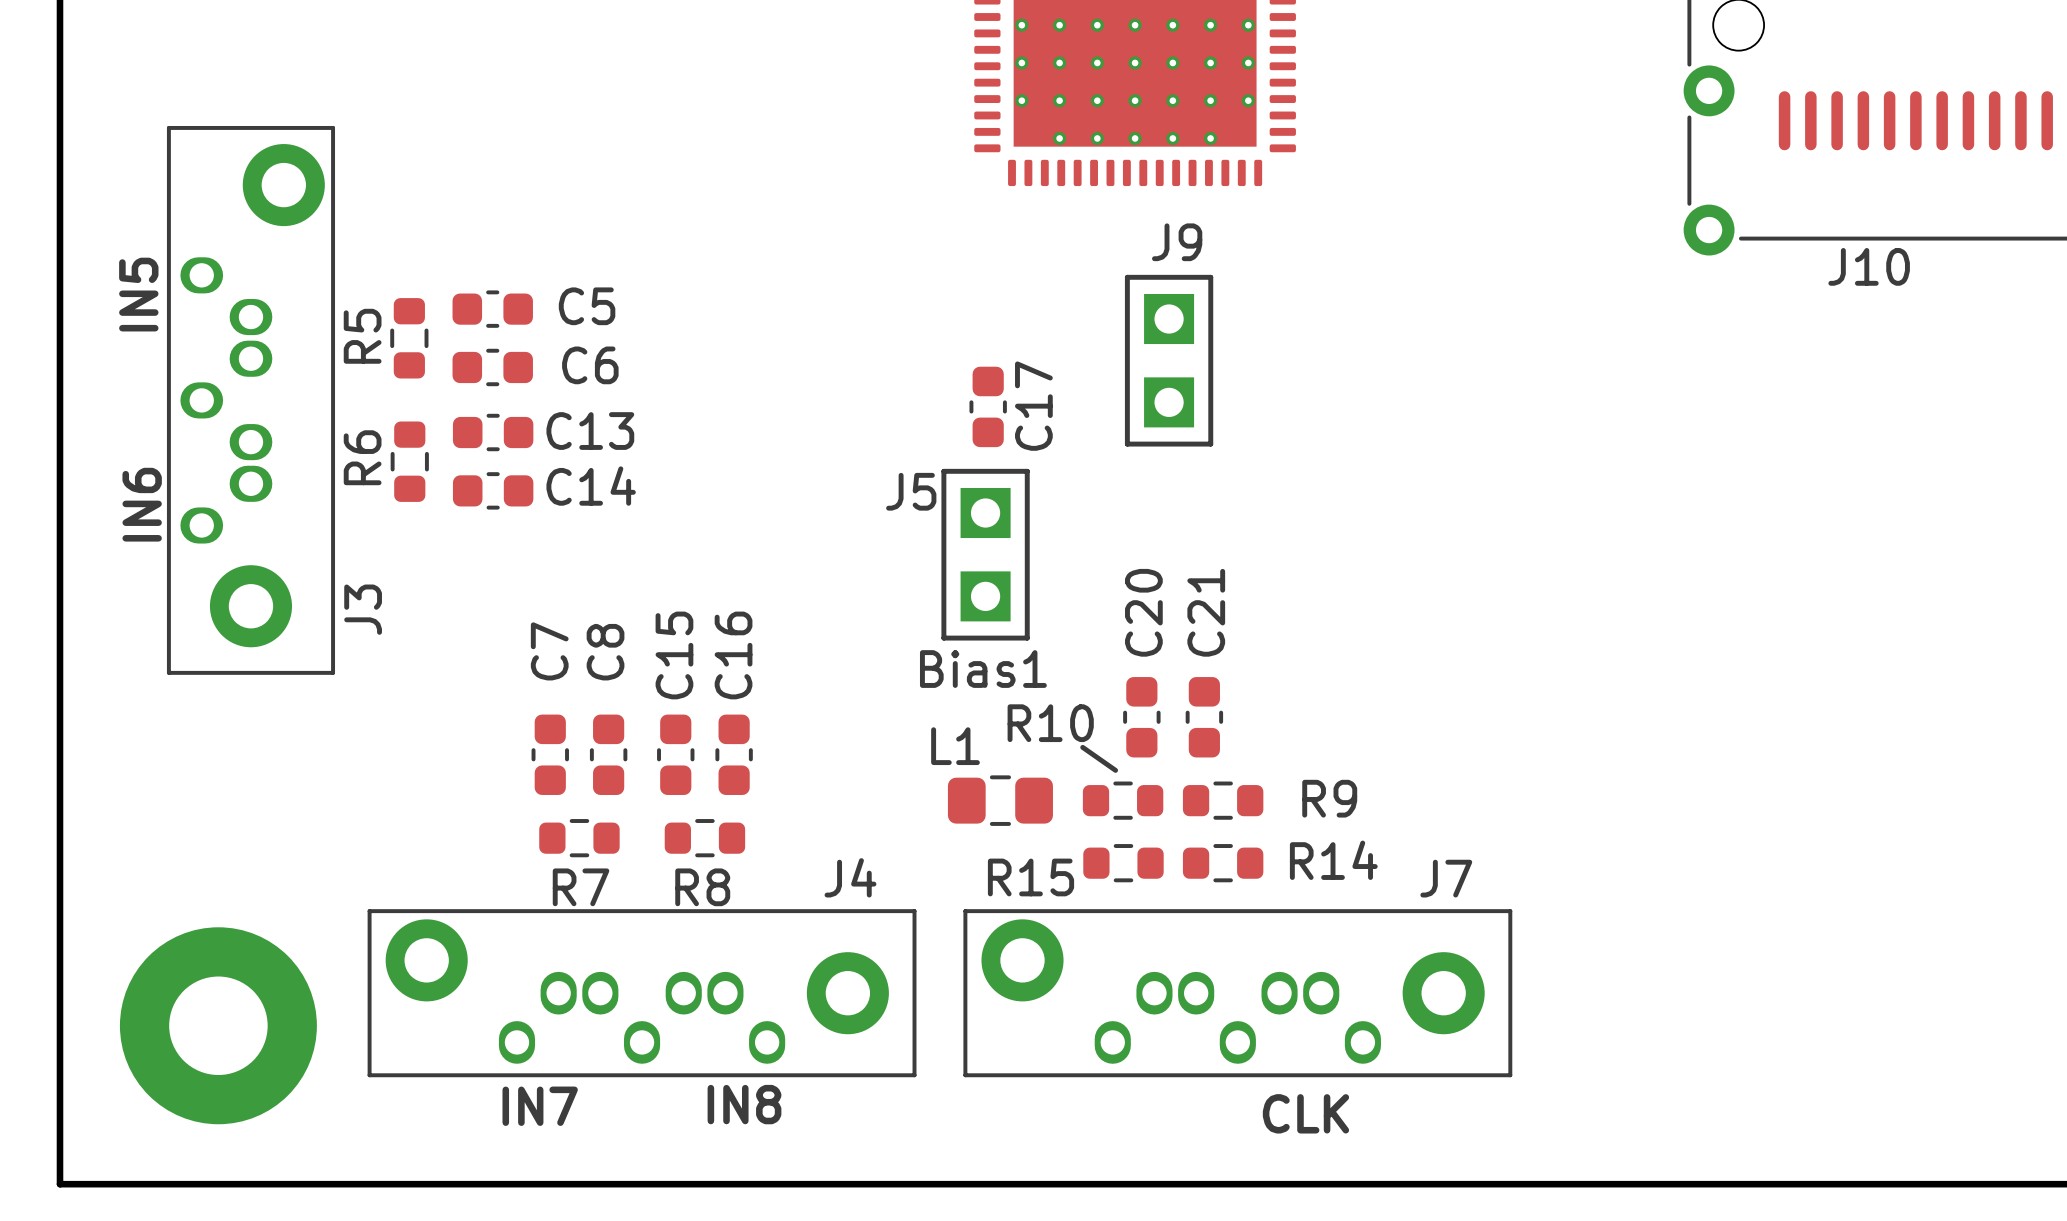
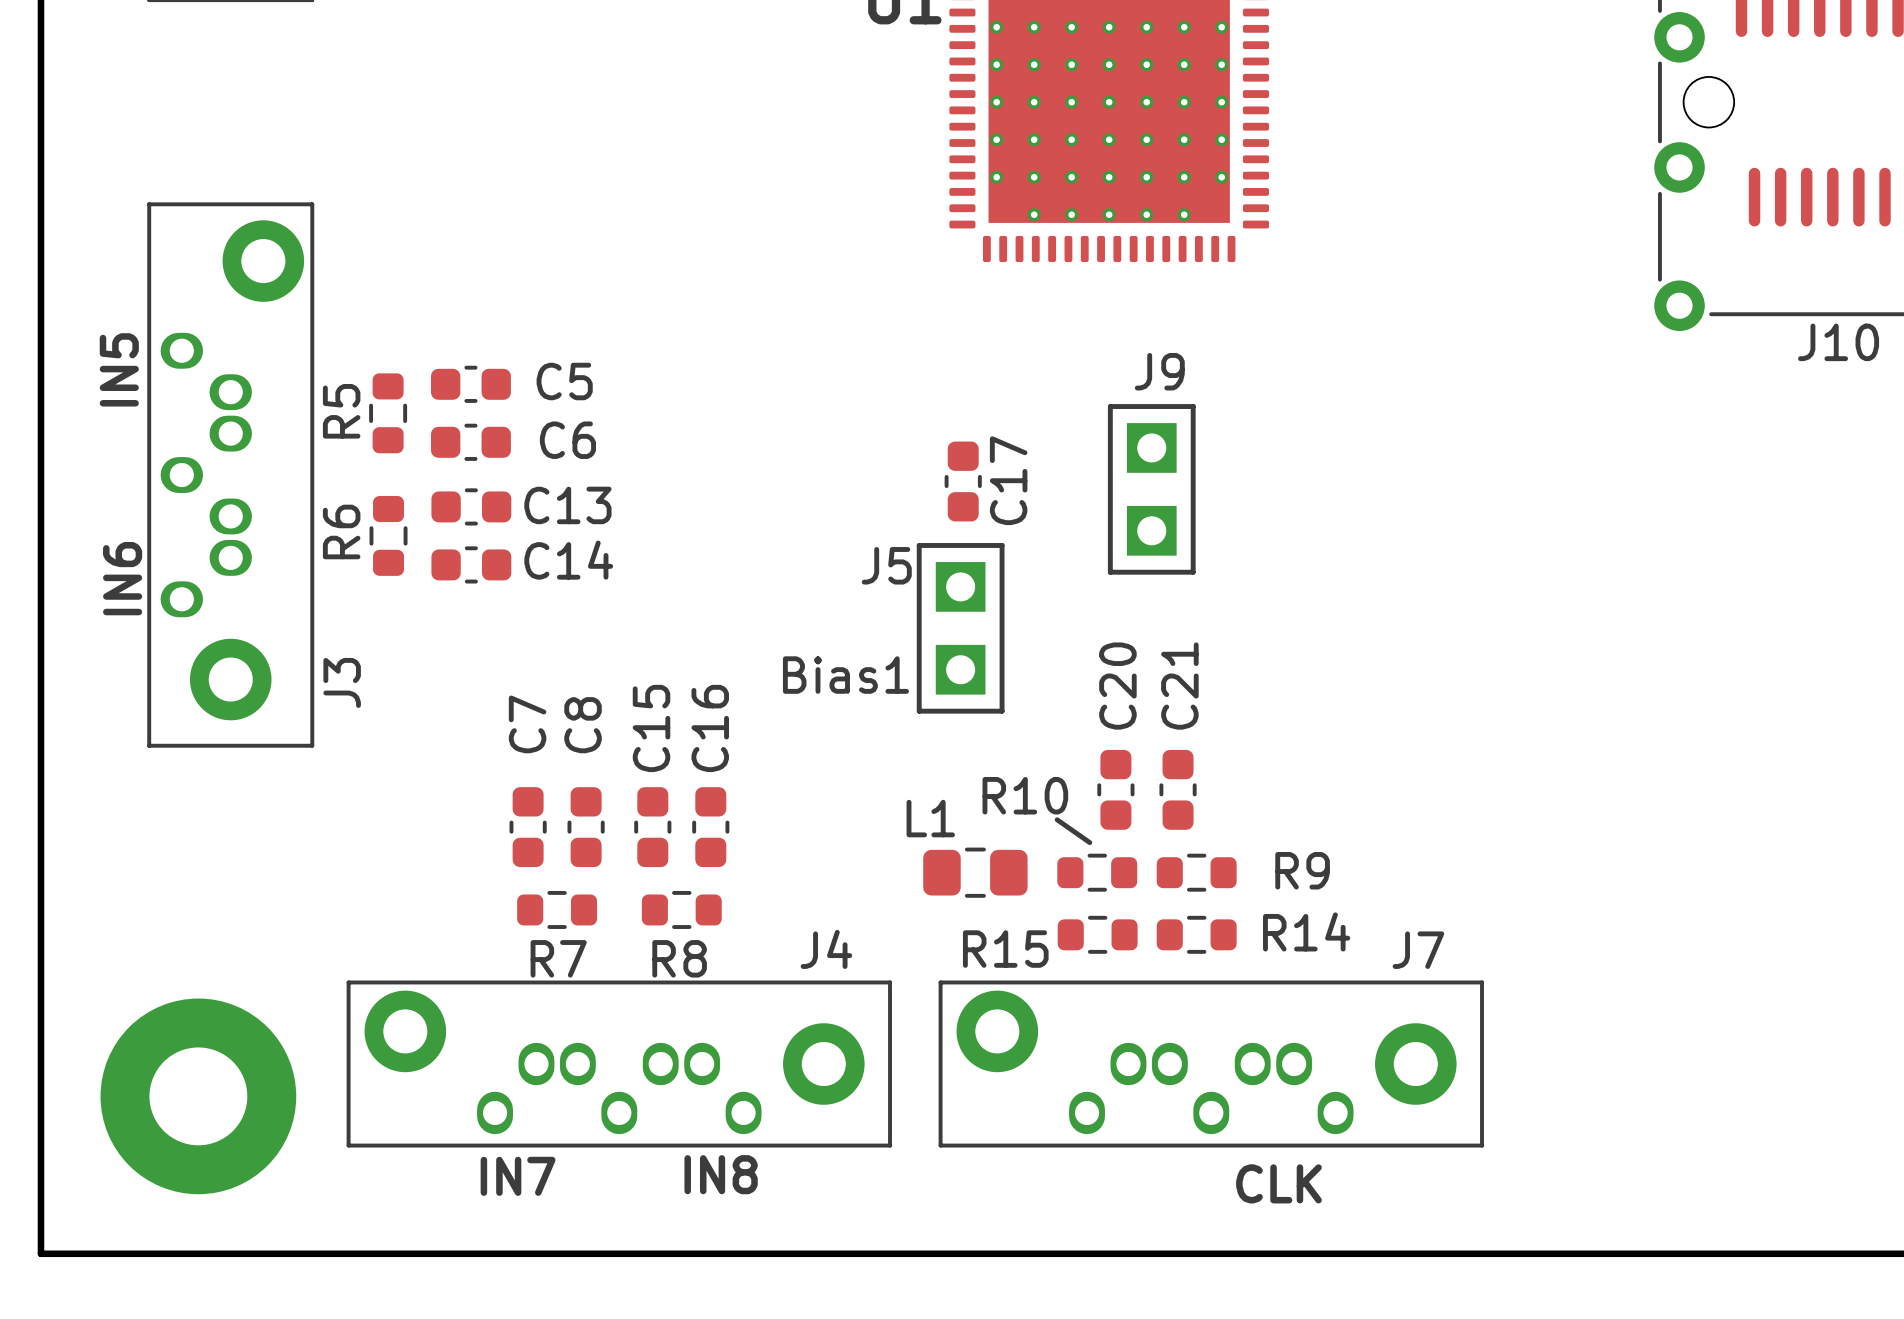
J9 position: (1169, 360) -> (1151, 489)
text position: Bias1 (983, 669) -> Bias1 (845, 675)

